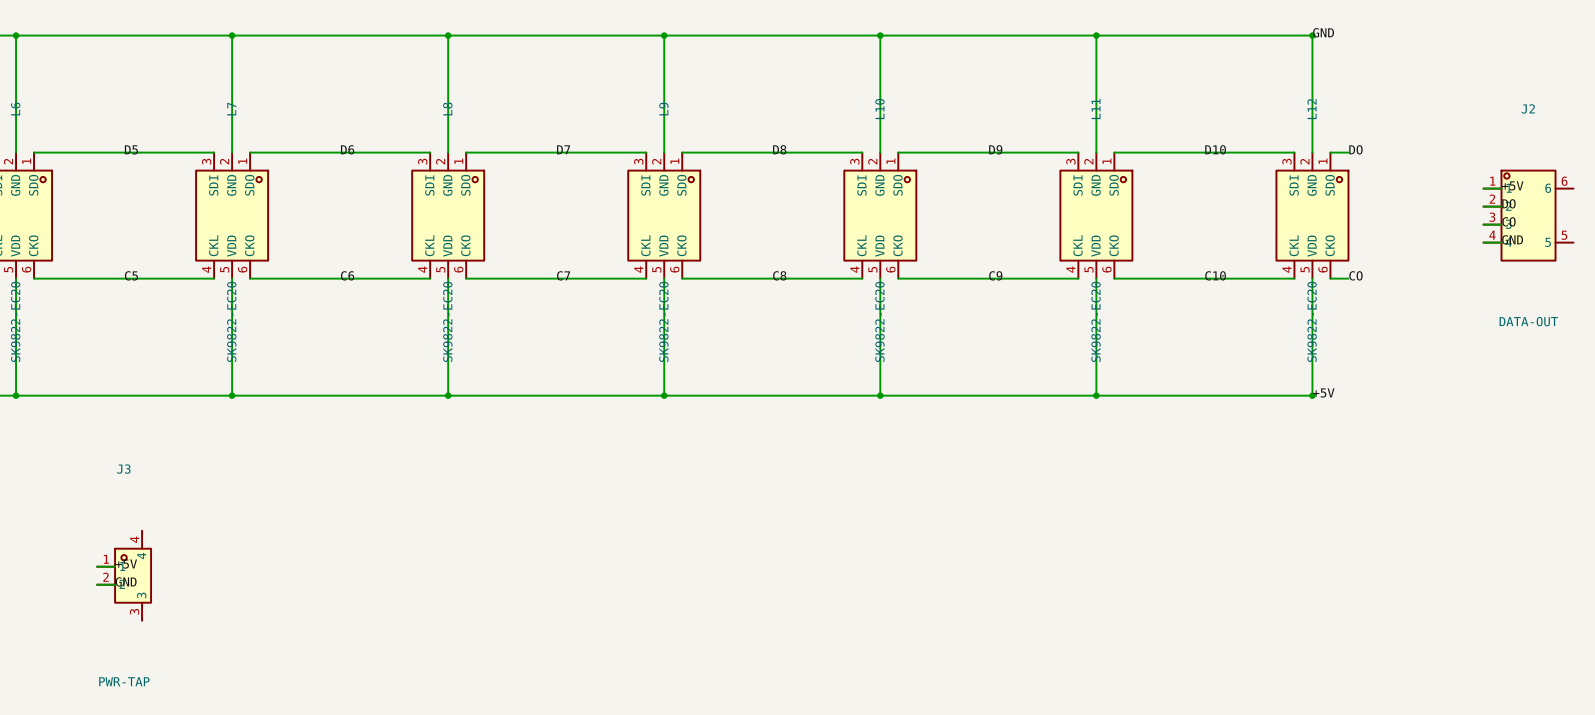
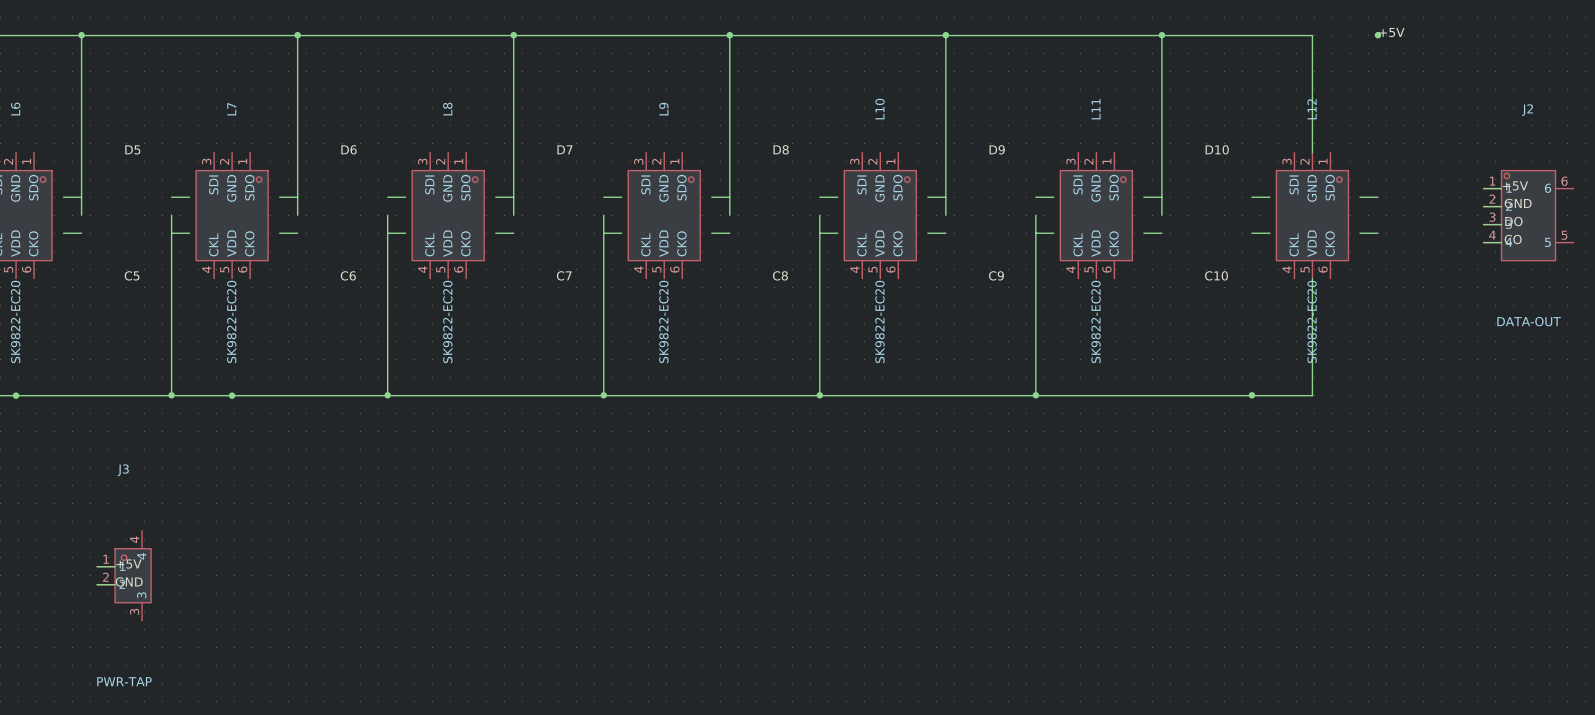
label: GND (1323, 32) -> none
label: none -> +5V (1391, 32)
wire: (16, 35) (16, 152) -> none
junction: (16, 35) -> none
wire: none -> (81, 35) (81, 215)
junction: none -> (81, 35)
wire: (232, 35) (232, 152) -> none
junction: (232, 35) -> none
wire: none -> (297, 35) (297, 215)
junction: none -> (297, 35)
wire: (448, 35) (448, 152) -> none
junction: (448, 35) -> none
wire: none -> (513, 35) (513, 215)
junction: none -> (513, 35)
wire: (664, 35) (664, 152) -> none
junction: (664, 35) -> none
wire: none -> (729, 35) (729, 215)
junction: none -> (729, 35)
wire: (880, 35) (880, 152) -> none
junction: (880, 35) -> none
wire: none -> (945, 35) (945, 215)
junction: none -> (945, 35)
wire: (1096, 35) (1096, 152) -> none
junction: (1096, 35) -> none
wire: none -> (1161, 35) (1161, 215)
junction: none -> (1161, 35)
junction: (1312, 35) -> none
junction: none -> (1377, 35)
label: DO (1355, 149) -> none
wire: (34, 152) (214, 152) -> none
wire: (250, 152) (430, 152) -> none
wire: (466, 152) (646, 152) -> none
wire: (682, 152) (862, 152) -> none
wire: (898, 152) (1078, 152) -> none
wire: (1114, 152) (1294, 152) -> none
wire: (1330, 152) (1348, 152) -> (1359, 197) (1377, 197)
wire: none -> (63, 197) (81, 197)
wire: none -> (171, 197) (189, 197)
wire: none -> (279, 197) (297, 197)
wire: none -> (387, 197) (405, 197)
wire: none -> (495, 197) (513, 197)
wire: none -> (603, 197) (621, 197)
wire: none -> (711, 197) (729, 197)
wire: none -> (819, 197) (837, 197)
wire: none -> (927, 197) (945, 197)
wire: none -> (1035, 197) (1053, 197)
wire: none -> (1143, 197) (1161, 197)
wire: none -> (1251, 197) (1269, 197)
label position: DO (1508, 203) -> DO (1513, 221)
wire: none -> (171, 215) (171, 395)
wire: none -> (387, 215) (387, 395)
wire: none -> (603, 215) (603, 395)
wire: none -> (819, 215) (819, 395)
wire: none -> (1035, 215) (1035, 395)
label position: CO (1509, 221) -> CO (1513, 239)
wire: none -> (63, 233) (81, 233)
wire: none -> (171, 233) (189, 233)
wire: none -> (279, 233) (297, 233)
wire: none -> (387, 233) (405, 233)
wire: none -> (495, 233) (513, 233)
wire: none -> (603, 233) (621, 233)
wire: none -> (711, 233) (729, 233)
wire: none -> (819, 233) (837, 233)
wire: none -> (927, 233) (945, 233)
wire: none -> (1035, 233) (1053, 233)
wire: none -> (1143, 233) (1161, 233)
wire: none -> (1251, 233) (1269, 233)
label position: GND (1512, 239) -> GND (1518, 203)
label: CO (1355, 275) -> none
wire: (16, 278) (16, 395) -> none
wire: (34, 278) (214, 278) -> none
wire: (232, 278) (232, 395) -> none
wire: (250, 278) (430, 278) -> none
wire: (448, 278) (448, 395) -> none
wire: (466, 278) (646, 278) -> none
wire: (664, 278) (664, 395) -> none
wire: (682, 278) (862, 278) -> none
wire: (880, 278) (880, 395) -> none
wire: (898, 278) (1078, 278) -> none
wire: (1096, 278) (1096, 395) -> none
wire: (1114, 278) (1294, 278) -> none
wire: (1330, 278) (1348, 278) -> (1359, 233) (1377, 233)
label: +5V (1323, 392) -> none
junction: none -> (171, 395)
junction: none -> (387, 395)
junction: (448, 395) -> none
junction: none -> (603, 395)
junction: (664, 395) -> none
junction: none -> (819, 395)
junction: (880, 395) -> none
junction: none -> (1035, 395)
junction: (1096, 395) -> none
junction: none -> (1251, 395)
junction: (1312, 395) -> none

